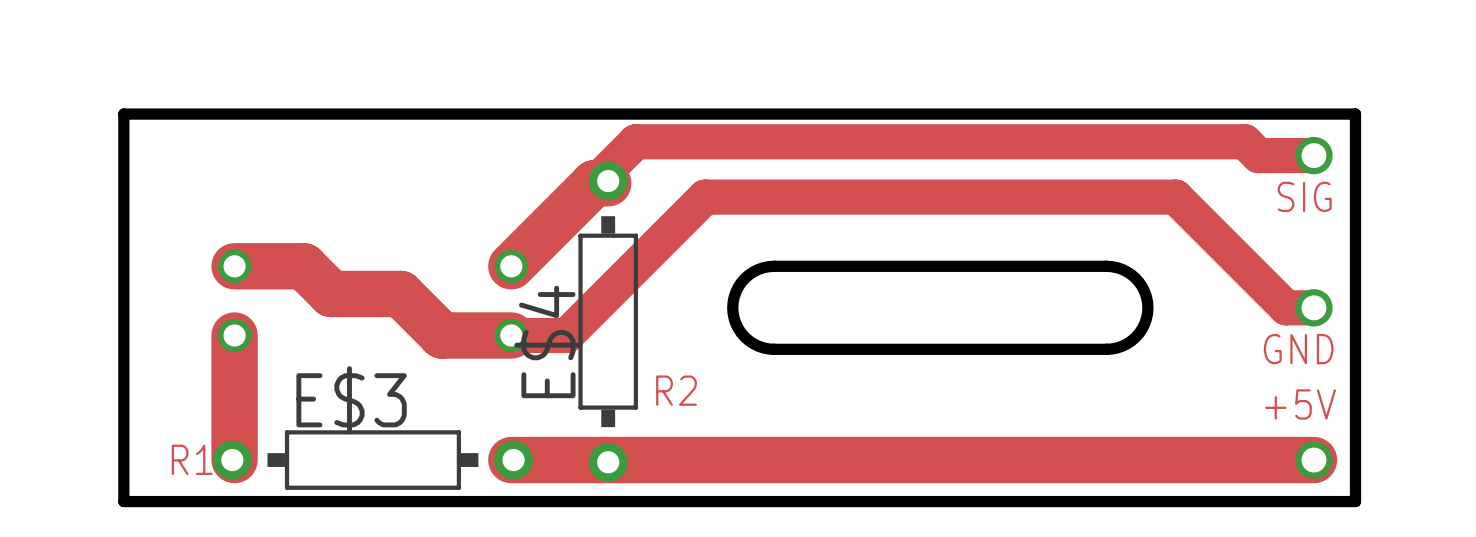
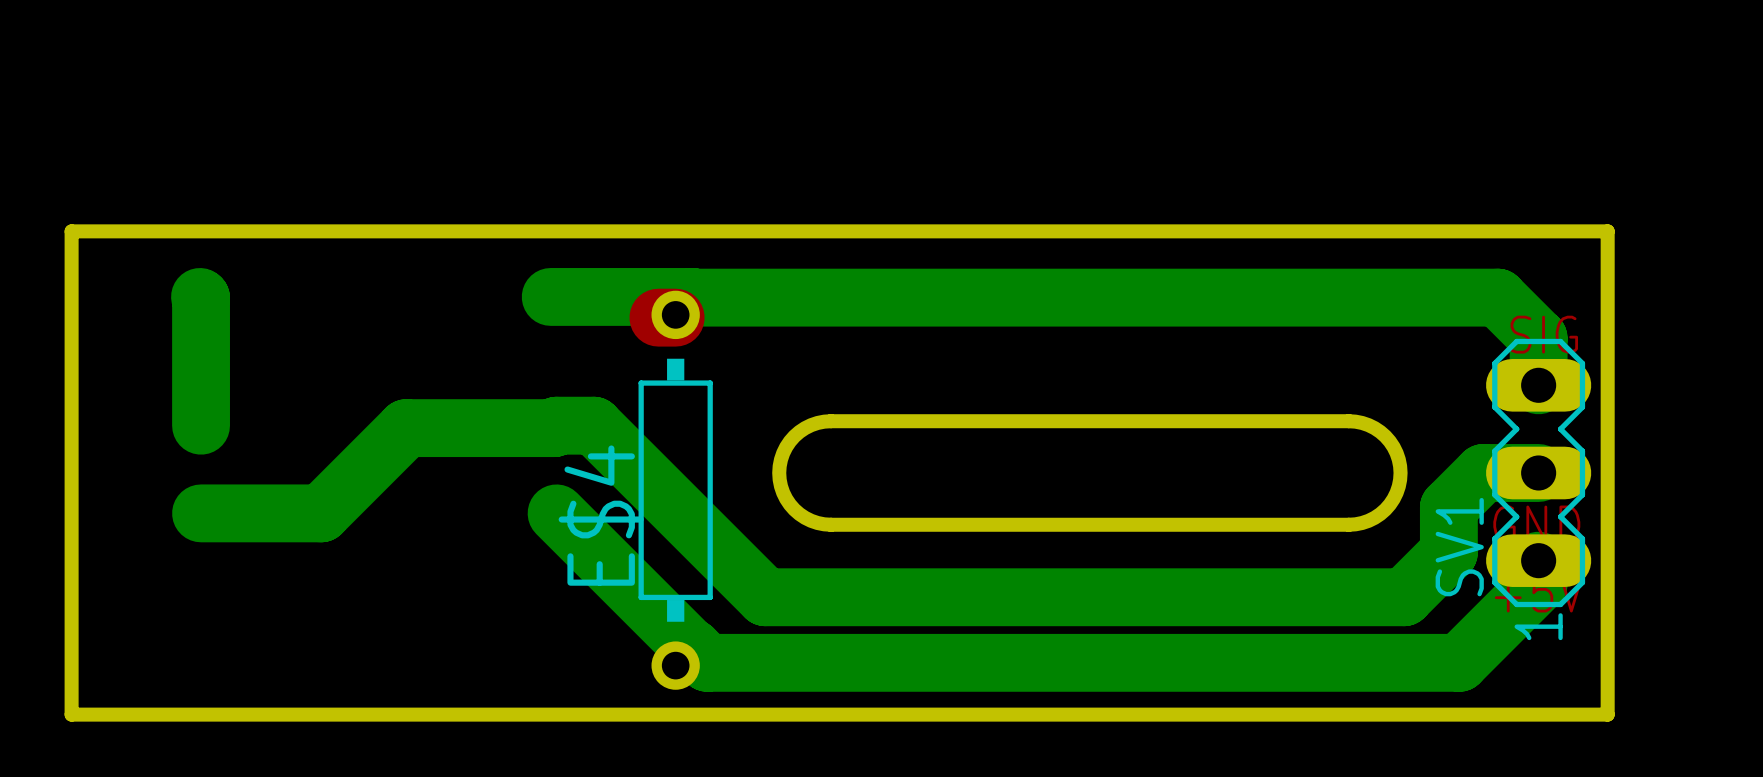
top track: (1313, 155) (1258, 155) (1244, 141) (635, 141) (511, 266) -> none
via: (1313, 155) -> none
bottom track: none -> (200, 296) (201, 425)
bottom track: none -> (550, 296) (1497, 297) (1538, 338) (1538, 385)
top track: (234, 266) (303, 266) (331, 293) (400, 293) (442, 335) (566, 335) (705, 197) (1175, 197) (1286, 307) (1313, 307) -> none
via: (234, 266) -> none
via: (511, 266) -> none
board edge: (774, 266) (758, 269) (744, 278) (735, 291) (732, 307) (735, 323) (744, 337) (758, 346) (774, 349) -> (882, 421) (824, 421) (805, 428) (794, 436) (786, 447) (780, 459) (779, 472) (780, 486) (786, 498) (794, 509) (805, 517) (824, 524) (882, 524)
board edge: (1106, 266) (1122, 269) (1135, 278) (1144, 291) (1147, 307) (1144, 323) (1135, 337) (1122, 346) (1106, 349) -> (1297, 421) (1355, 421) (1374, 428) (1385, 436) (1393, 447) (1398, 459) (1400, 472) (1398, 486) (1393, 498) (1385, 509) (1374, 517) (1355, 524) (1297, 524)
bottom track: none -> (1538, 472) (1483, 472) (1448, 507) (1448, 552) (1404, 597) (765, 597) (593, 425) (556, 425) (554, 428) (406, 428) (321, 513) (201, 513)
SV1: none -> (1538, 472)
via: (1313, 307) -> none
top track: (234, 335) (234, 460) -> none
via: (234, 335) -> none
via: (511, 335) -> none
bottom track: none -> (556, 513) (707, 662) (1459, 662) (1538, 583) (1538, 560)
text: R2 (676, 390) -> none
text: R1 (192, 459) -> none
E$3: (372, 460) -> none
top track: (511, 460) (1313, 460) -> none
via: (1313, 460) -> none

